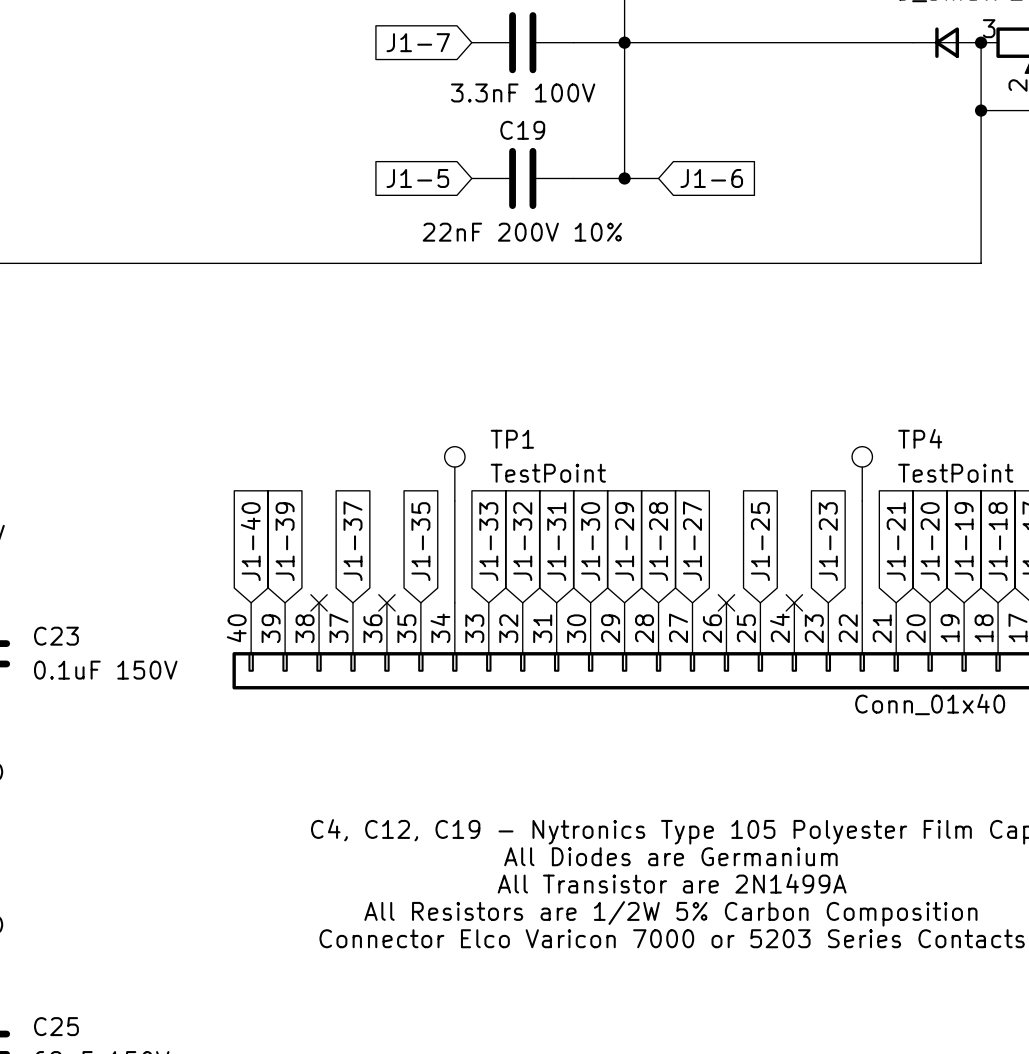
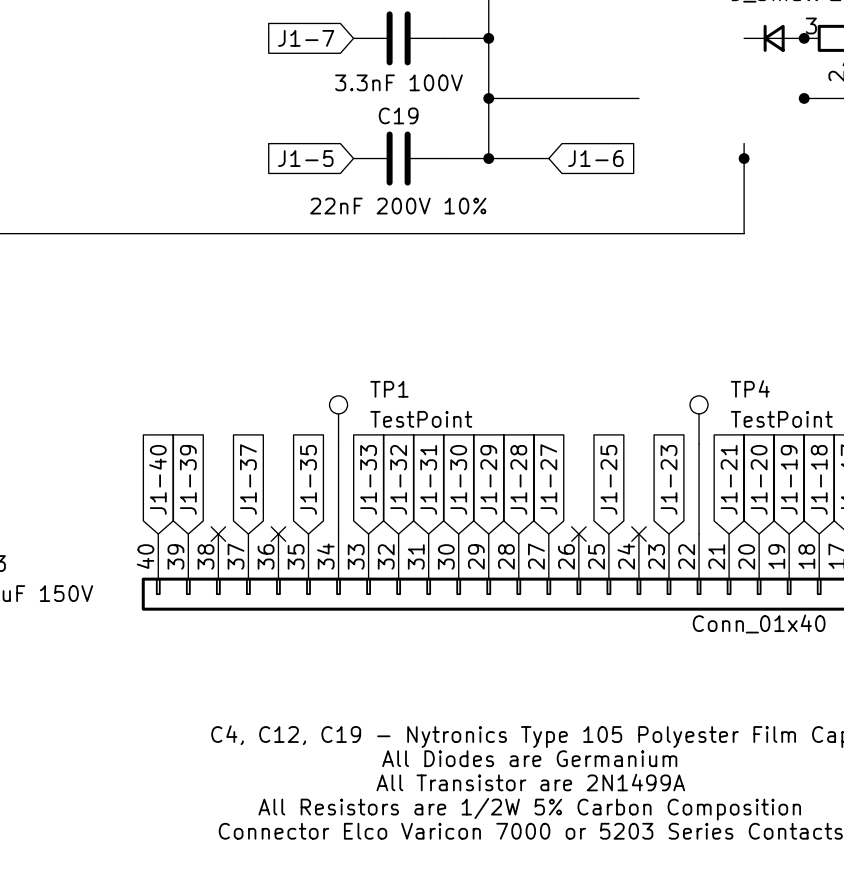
wire: (624, 42) (913, 42) -> none
wire: (981, 42) (981, 263) (913, 263) -> (744, 143) (744, 233)
wire: none -> (488, 98) (638, 98)
junction: none -> (488, 98)
wire: none -> (518, 158) (548, 158)
global label position: J1-6 (711, 178) -> J1-6 (595, 158)
junction: none -> (744, 158)

